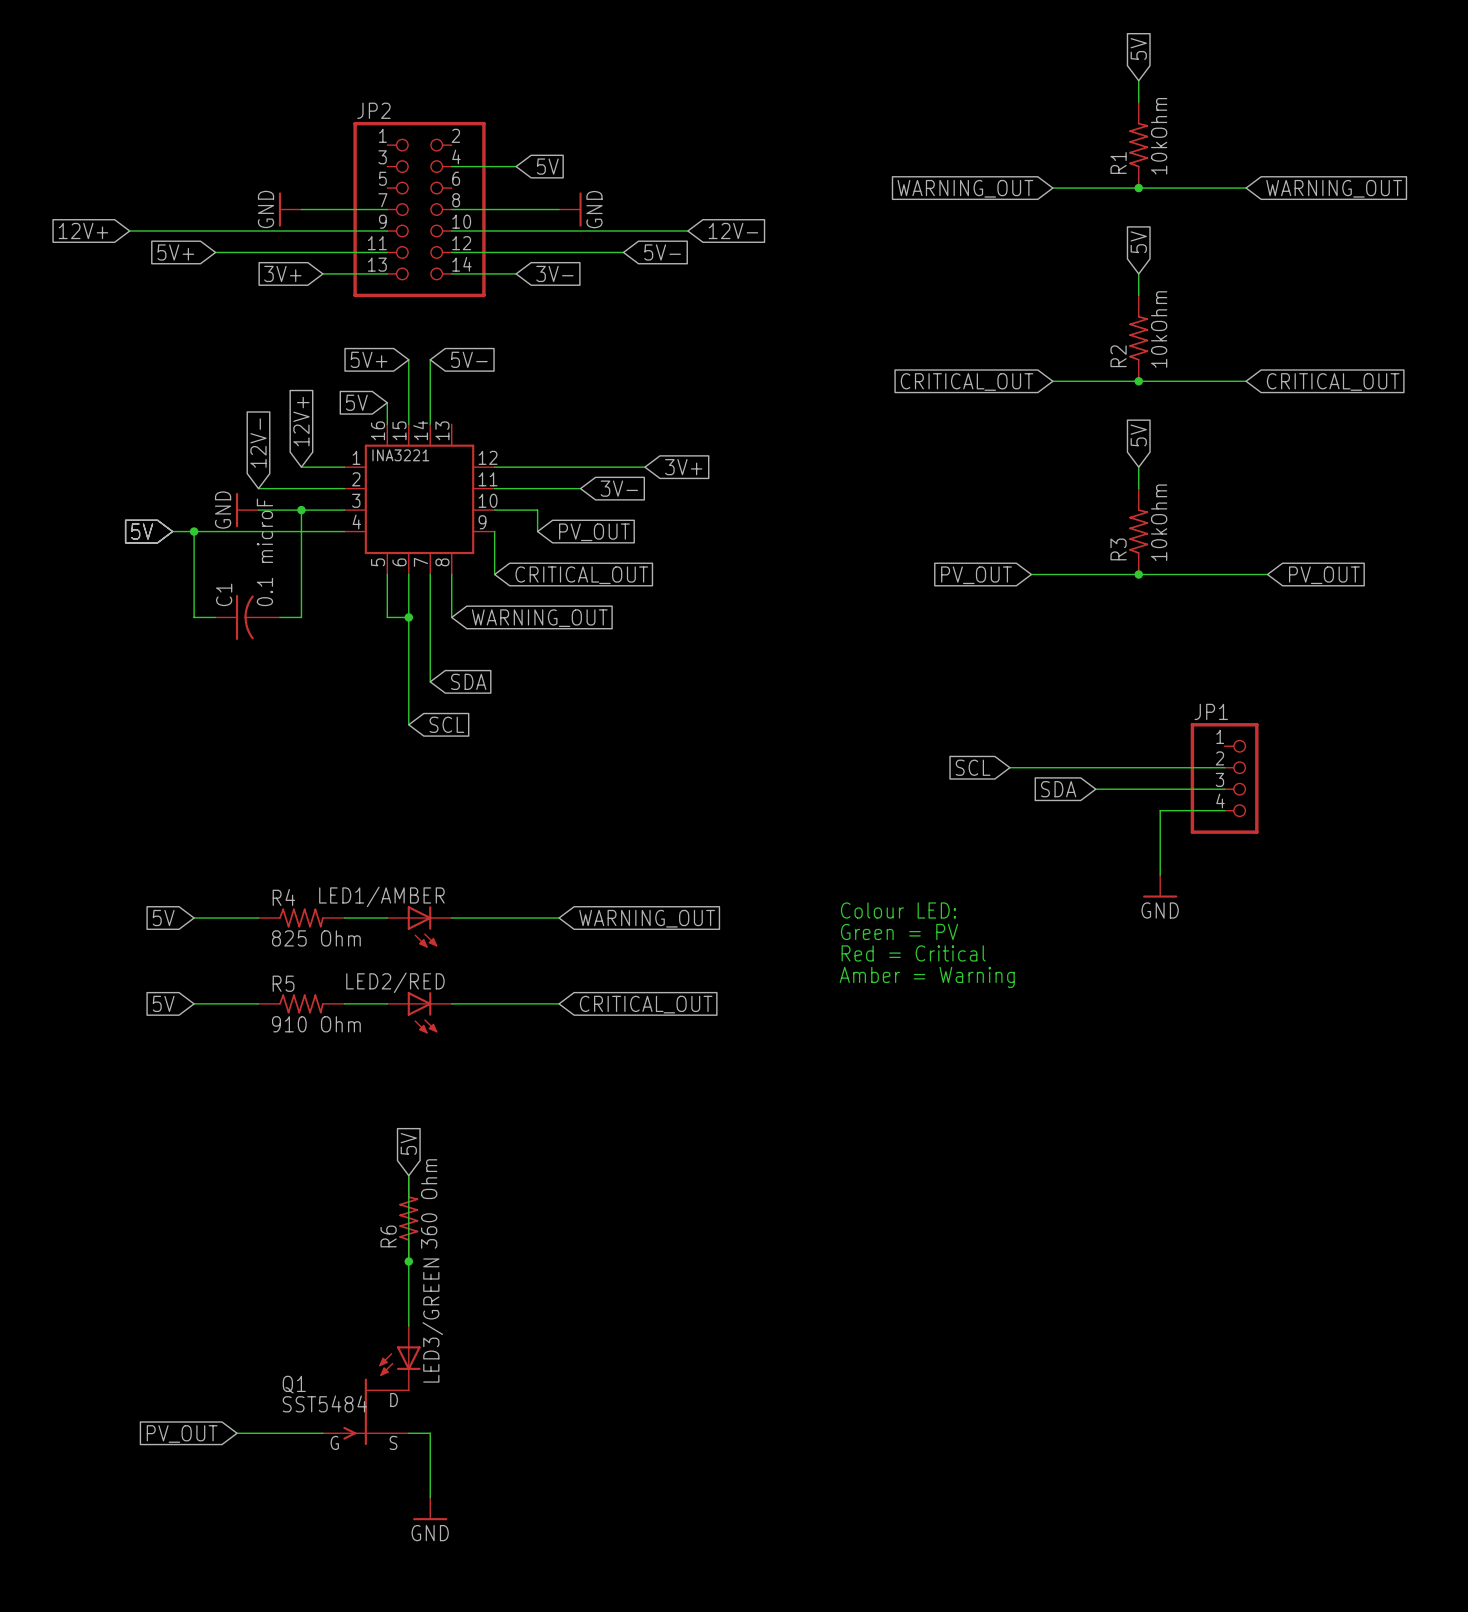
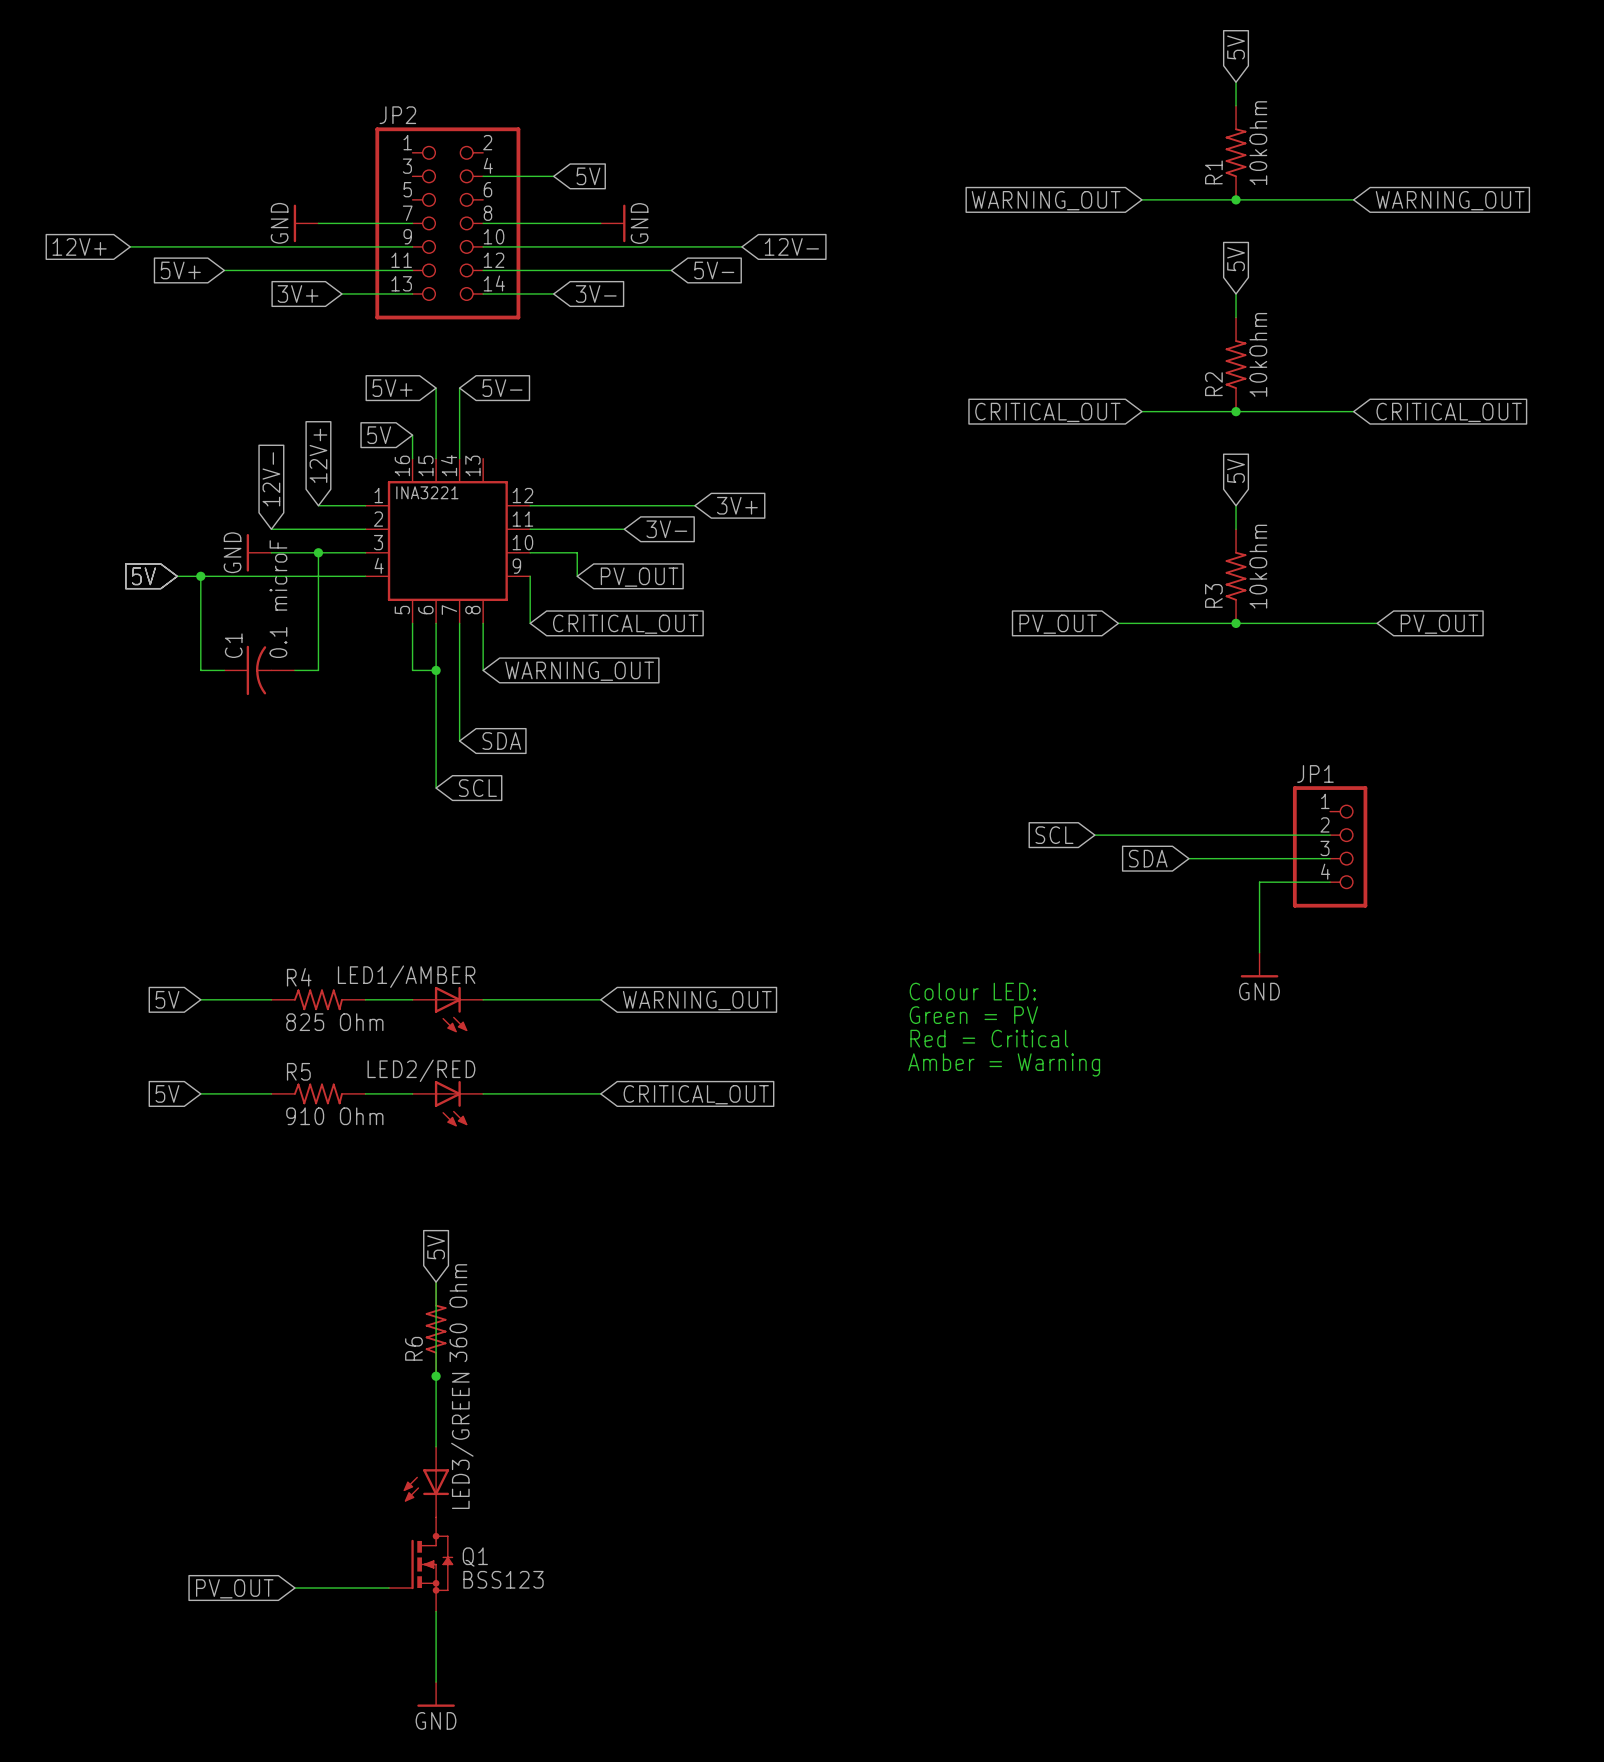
Q1 symbol: [322, 1378, 409, 1446] -> [389, 1517, 454, 1612]
Q1 name position: Q1 (294, 1384) -> Q1 (475, 1557)
Q1 value: SST5484 (324, 1403) -> BSS123 (503, 1579)
global label position: PV_OUT (182, 1433) -> PV_OUT (234, 1588)
wire: (237, 1433) (322, 1433) -> (294, 1588) (389, 1588)
wire: (408, 1433) (430, 1433) (430, 1497) -> none
wire: none -> (436, 1611) (436, 1682)
power symbol position: GND (430, 1508) -> GND (436, 1694)

